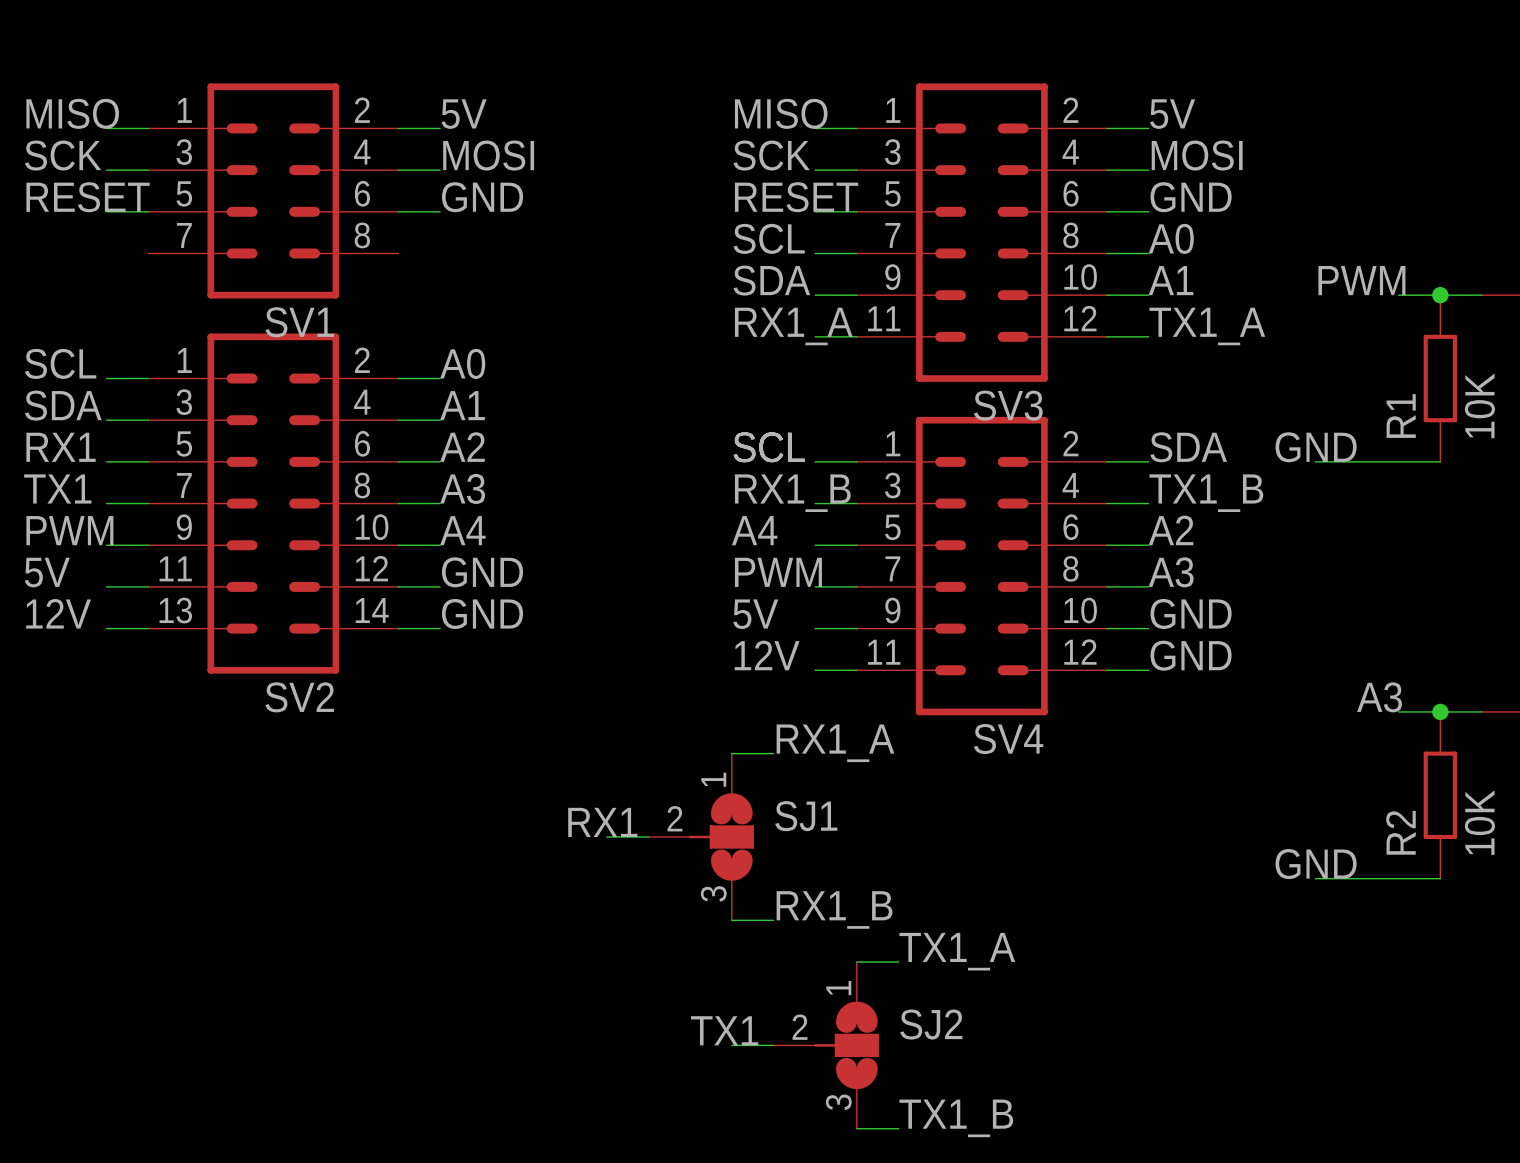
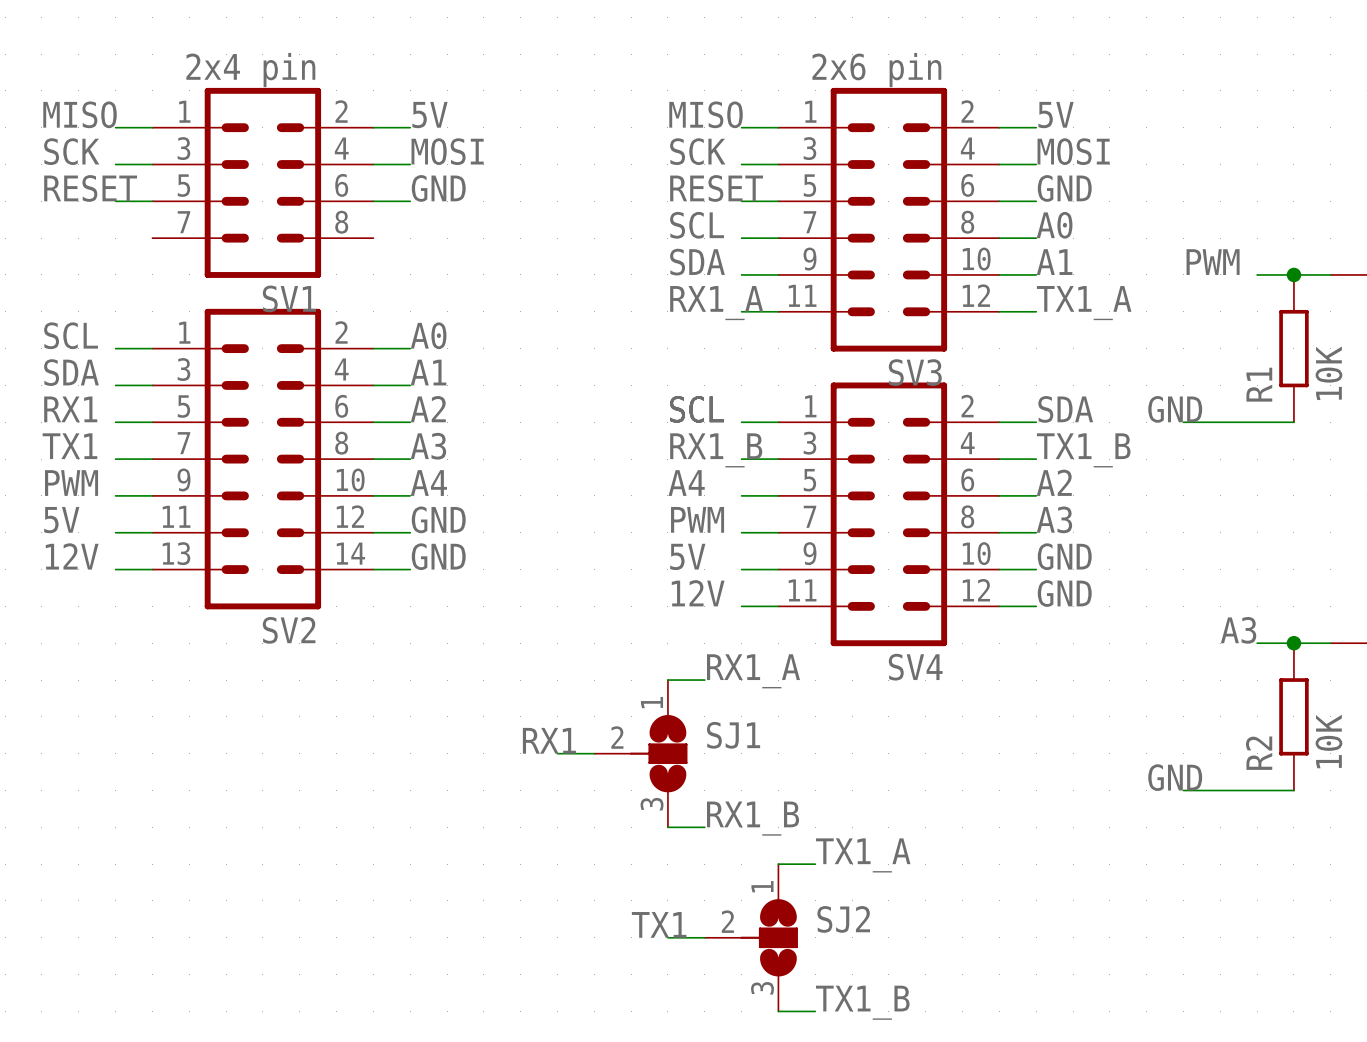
SV1 value: none -> 2x4 pin (250, 70)
SV3 value: none -> 2x6 pin (876, 70)

